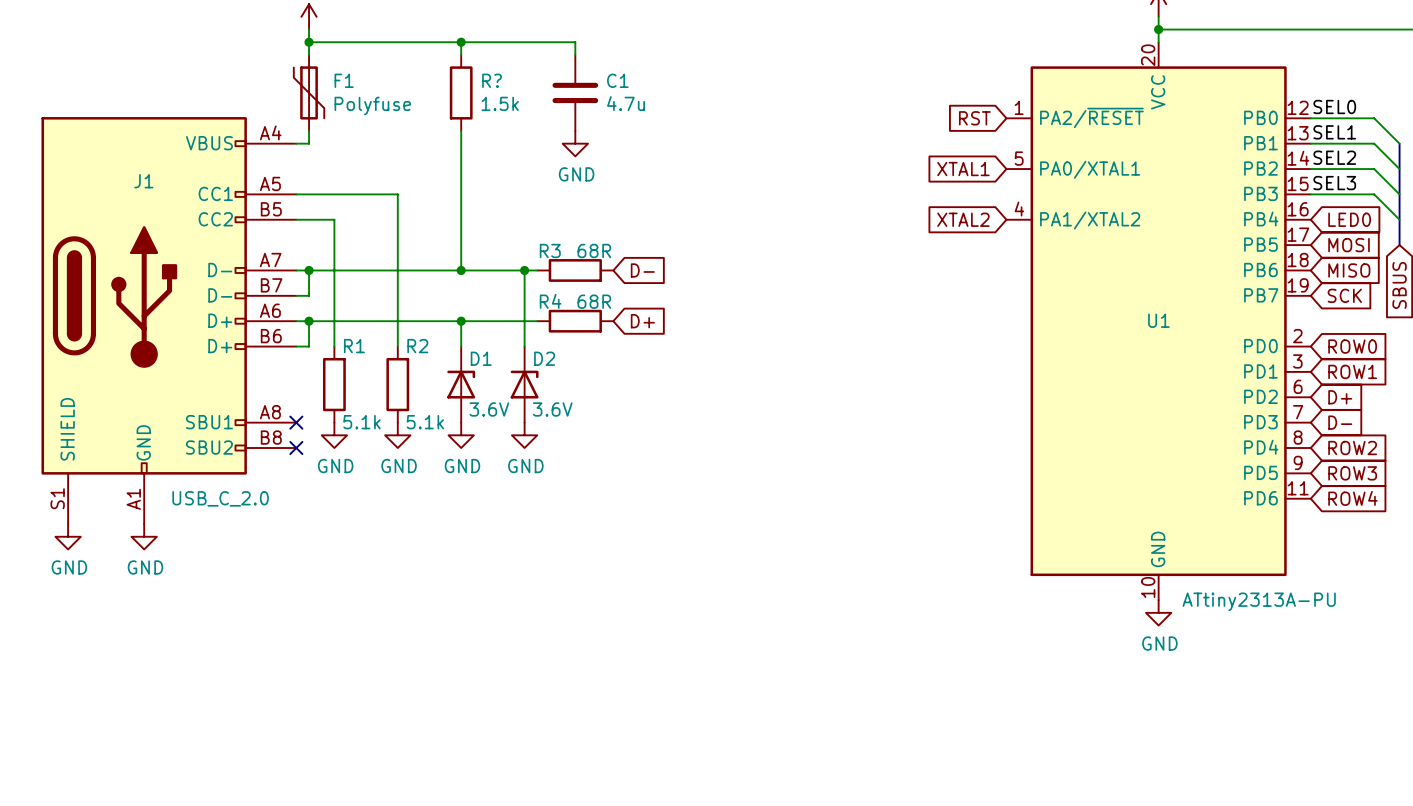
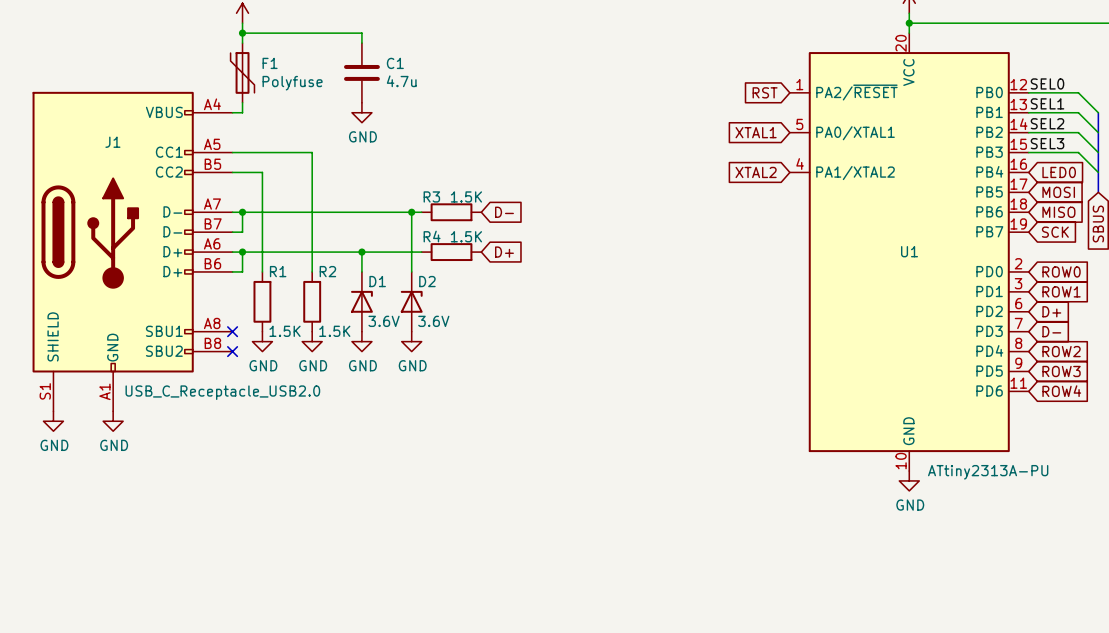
wire: (461, 42) (575, 42) (575, 54) -> none
junction: (461, 42) -> none
R?: 1.5k (461, 92) -> none
C1 position: (575, 92) -> (361, 72)
wire: (461, 130) (461, 270) -> none
power symbol position: GND (575, 143) -> GND (361, 112)
R3 value: 68R (594, 250) -> 1.5K (466, 196)
junction: (461, 270) -> none
R4 value: 68R (594, 301) -> 1.5K (466, 236)
R1 value: 5.1k (361, 422) -> 1.5K (285, 331)
R2 value: 5.1k (425, 422) -> 1.5K (334, 331)
J1 value: USB_C_2.0 (220, 498) -> USB_C_Receptacle_USB2.0 (222, 392)

